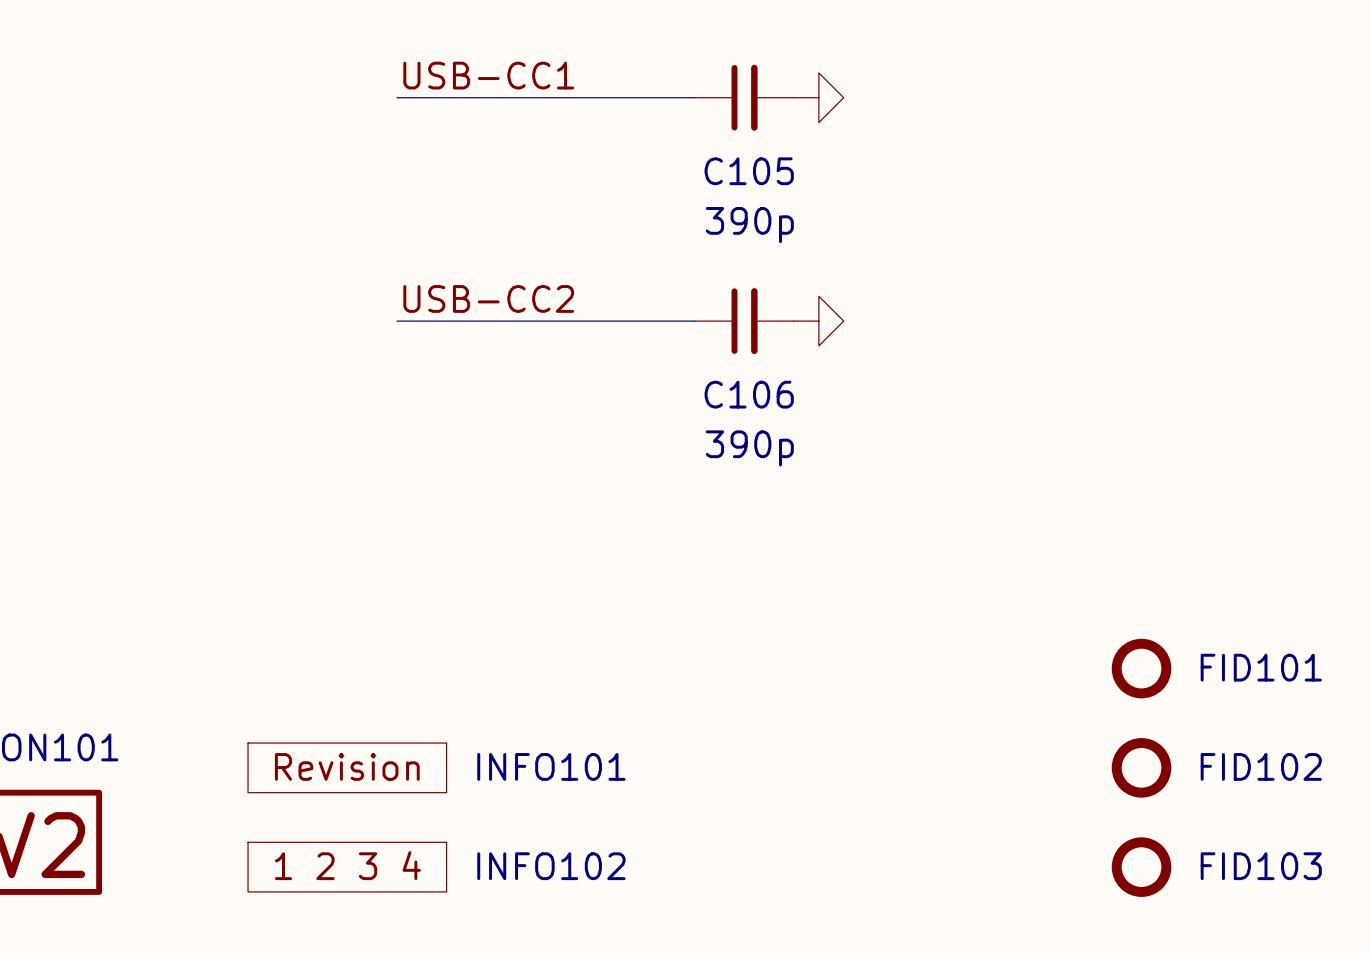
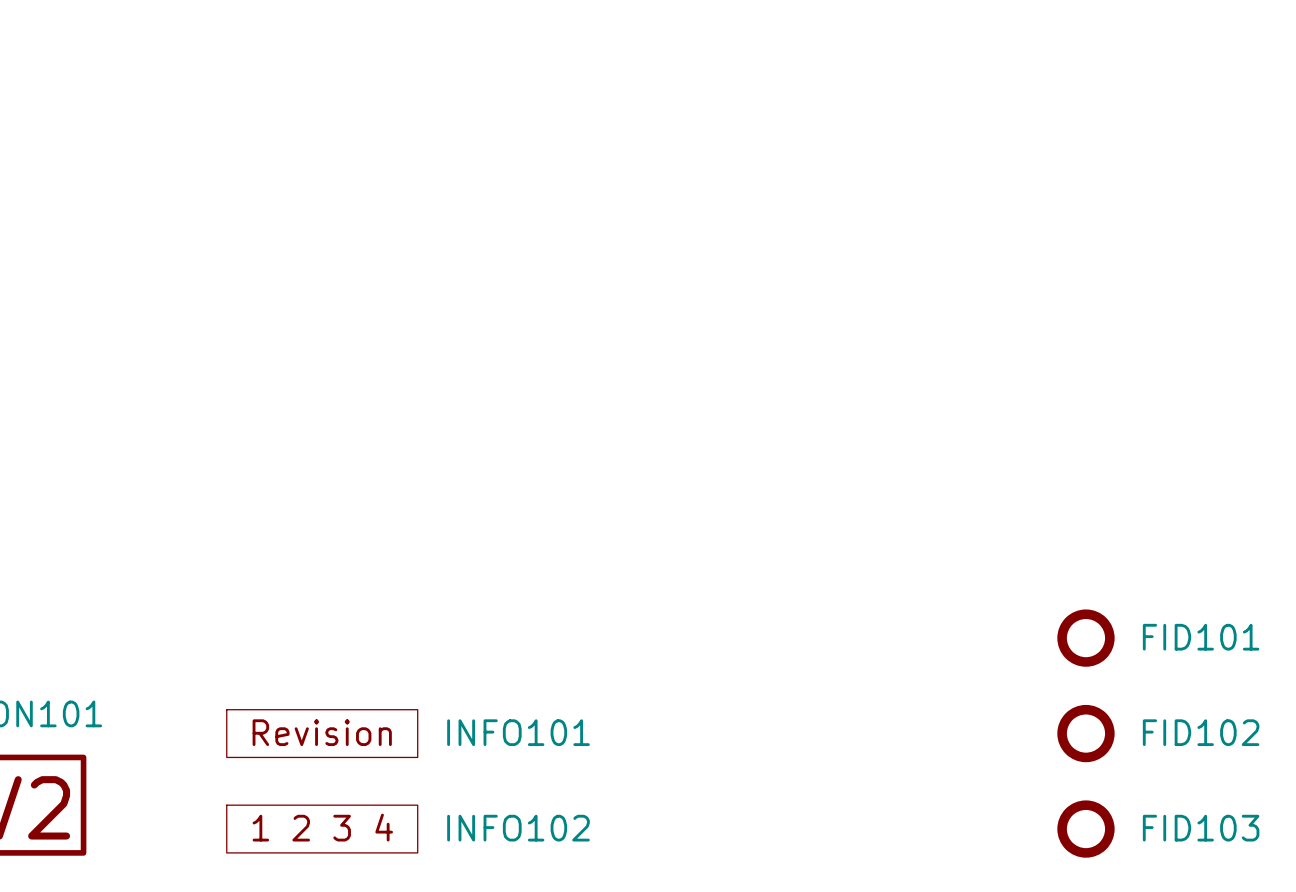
label: USB-CC1 (488, 75) -> none
wire: (396, 97) (694, 97) -> none
C105: 390p (744, 97) -> none
power symbol: (818, 97) -> none
label: USB-CC2 (488, 298) -> none
wire: (396, 321) (694, 321) -> none
C106: 390p (744, 321) -> none
power symbol: (818, 321) -> none

